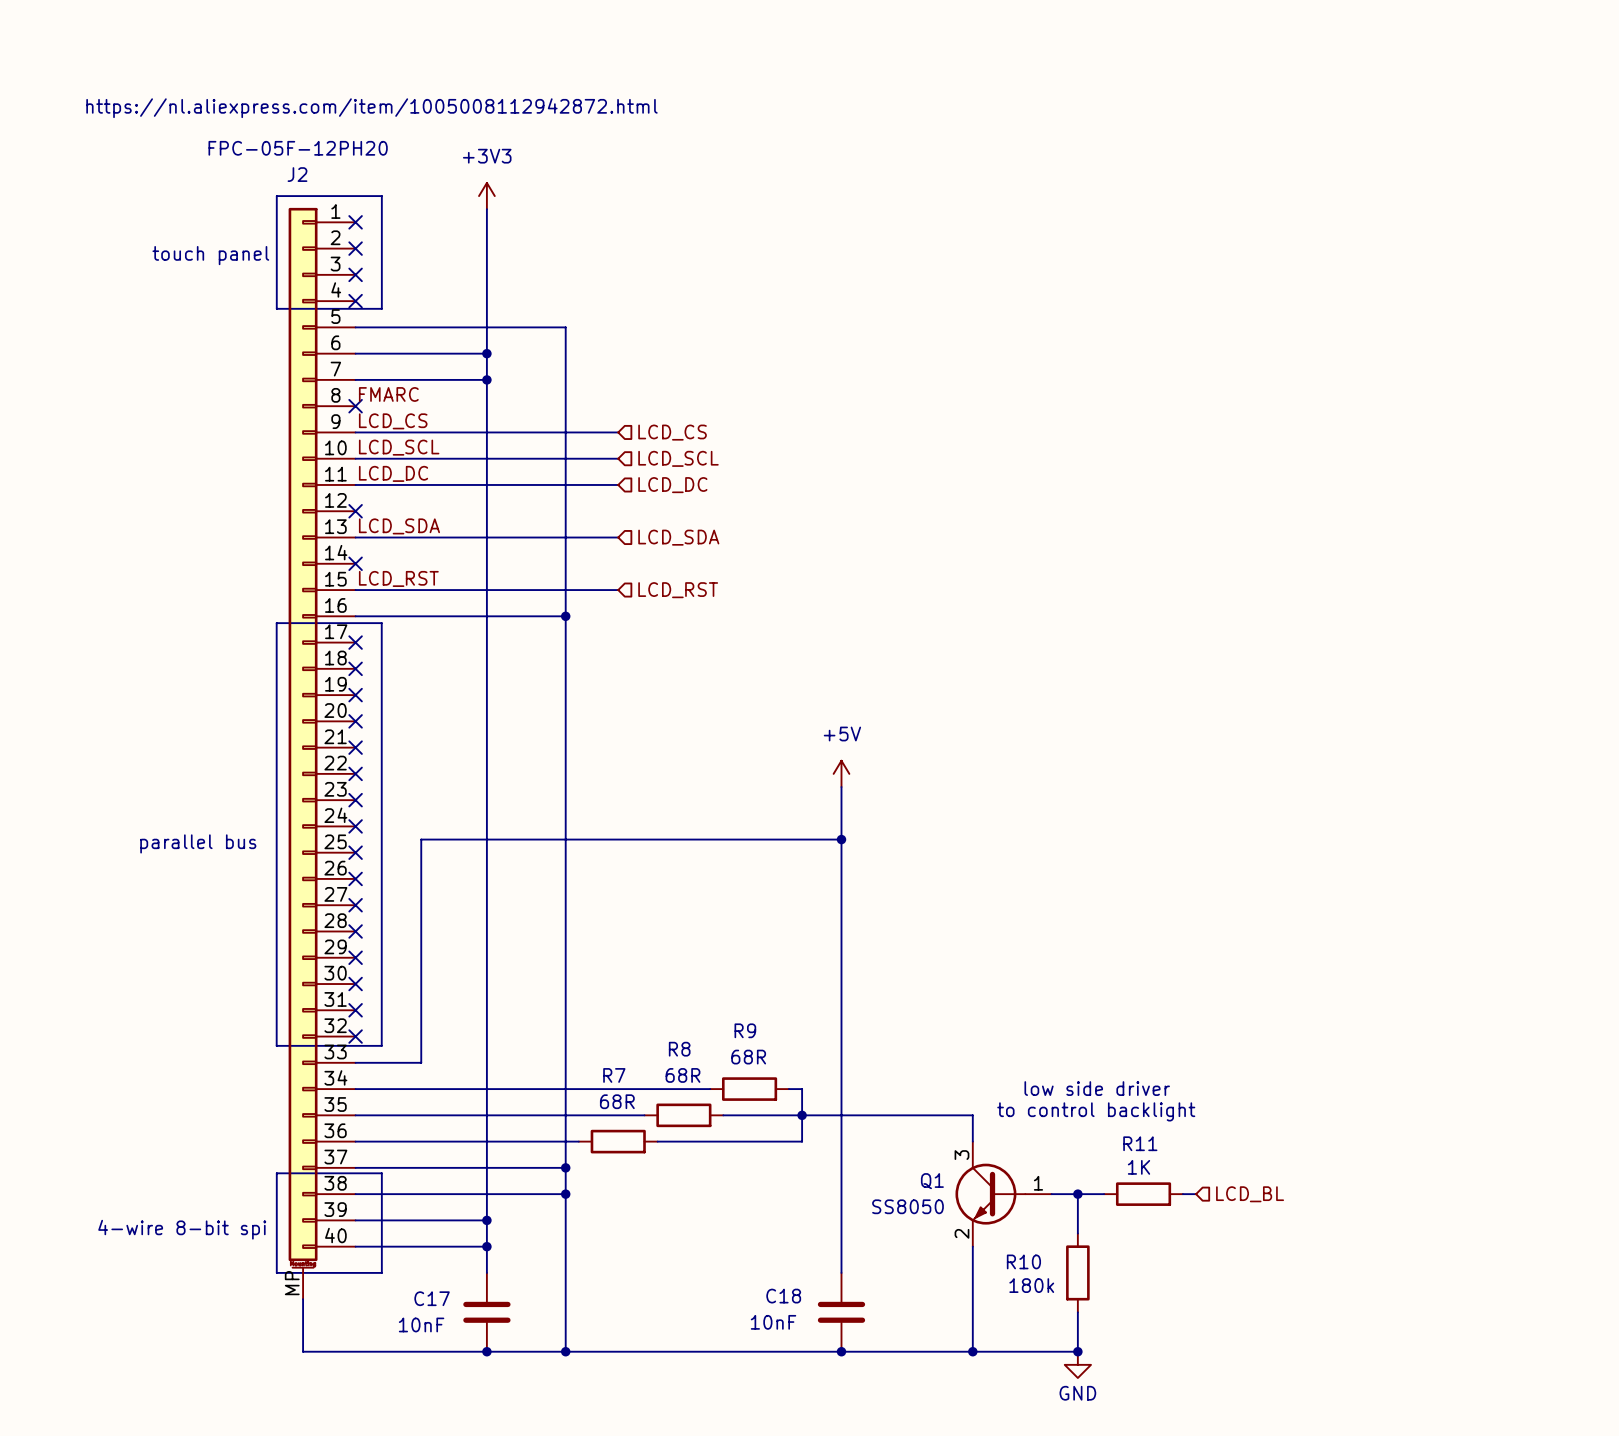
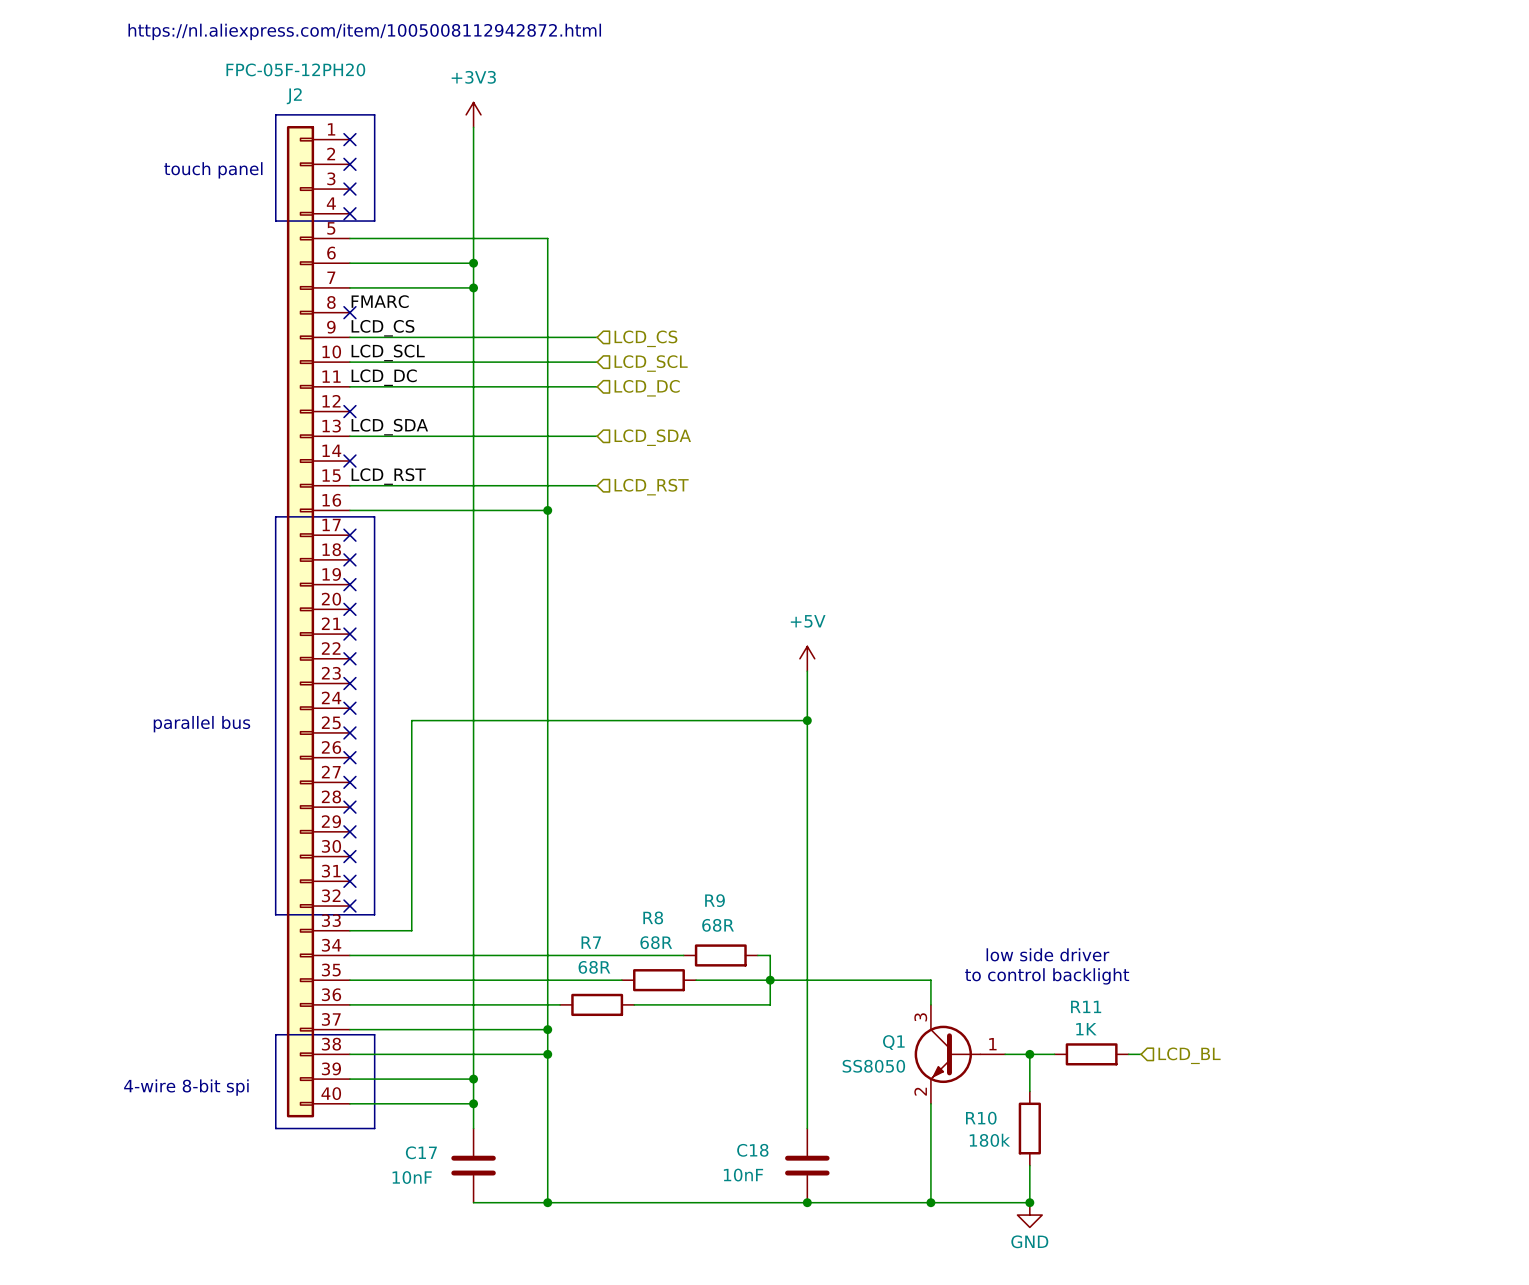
J2 symbol: [288, 207, 356, 1300] -> [286, 126, 350, 1118]
wire: (303, 1299) (303, 1351) (486, 1351) -> none
junction: (486, 1351) -> none

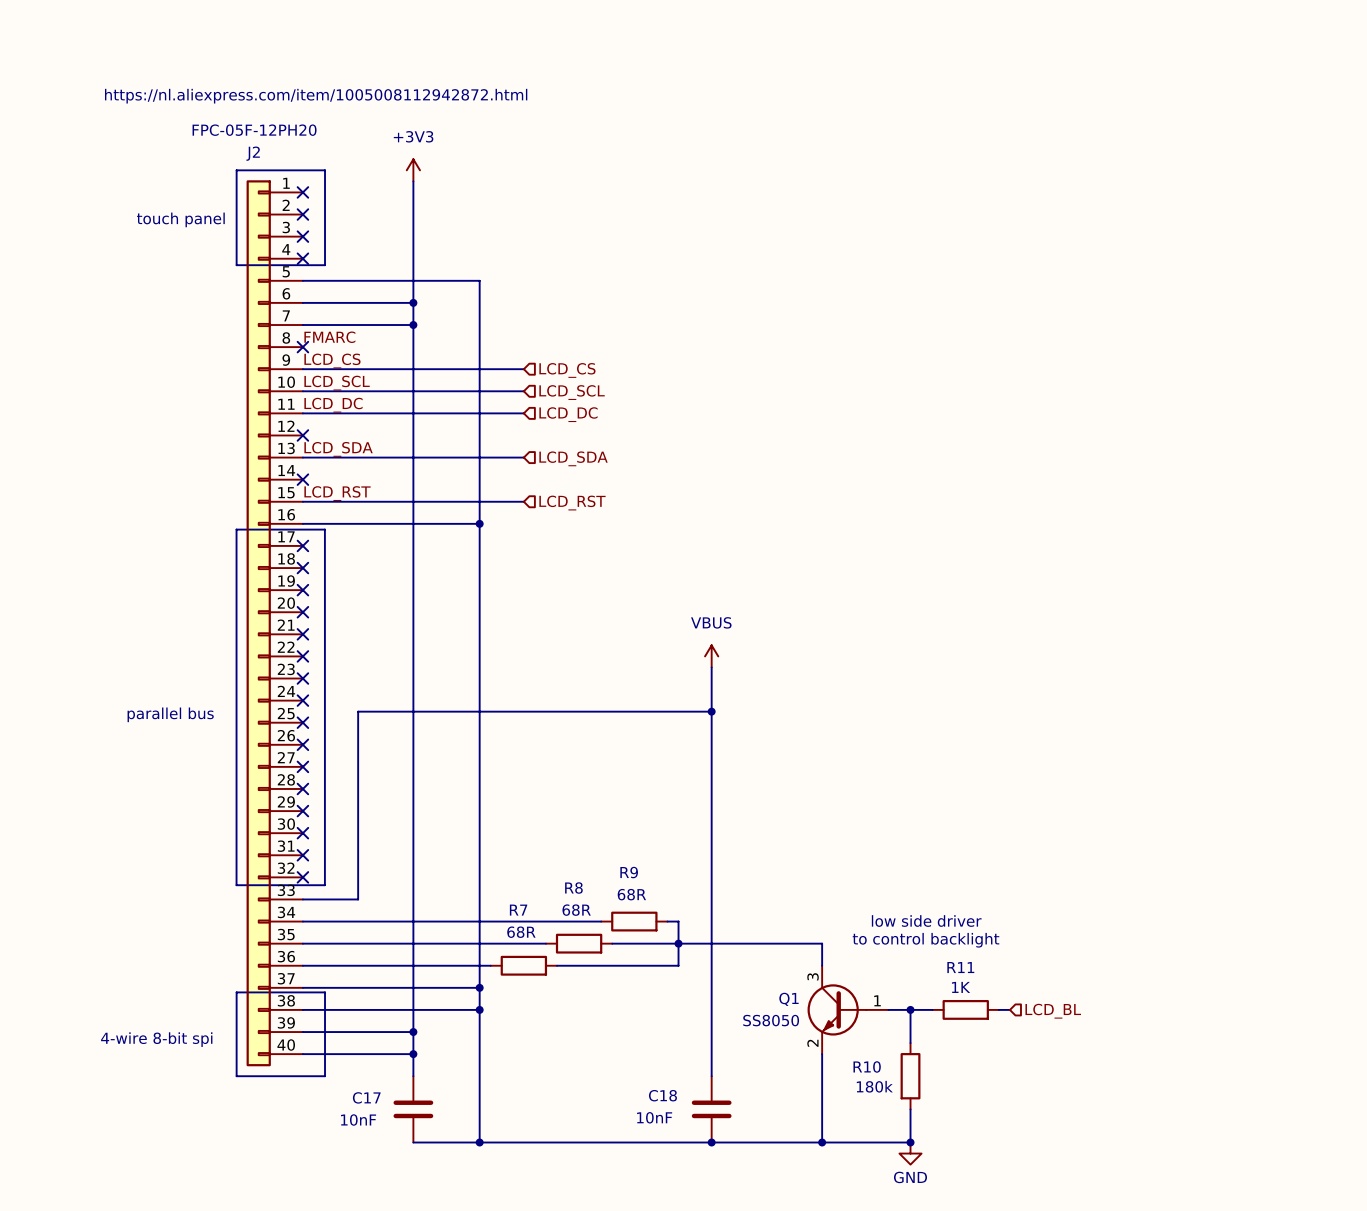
power symbol: +5V (807, 658) -> VBUS (711, 656)

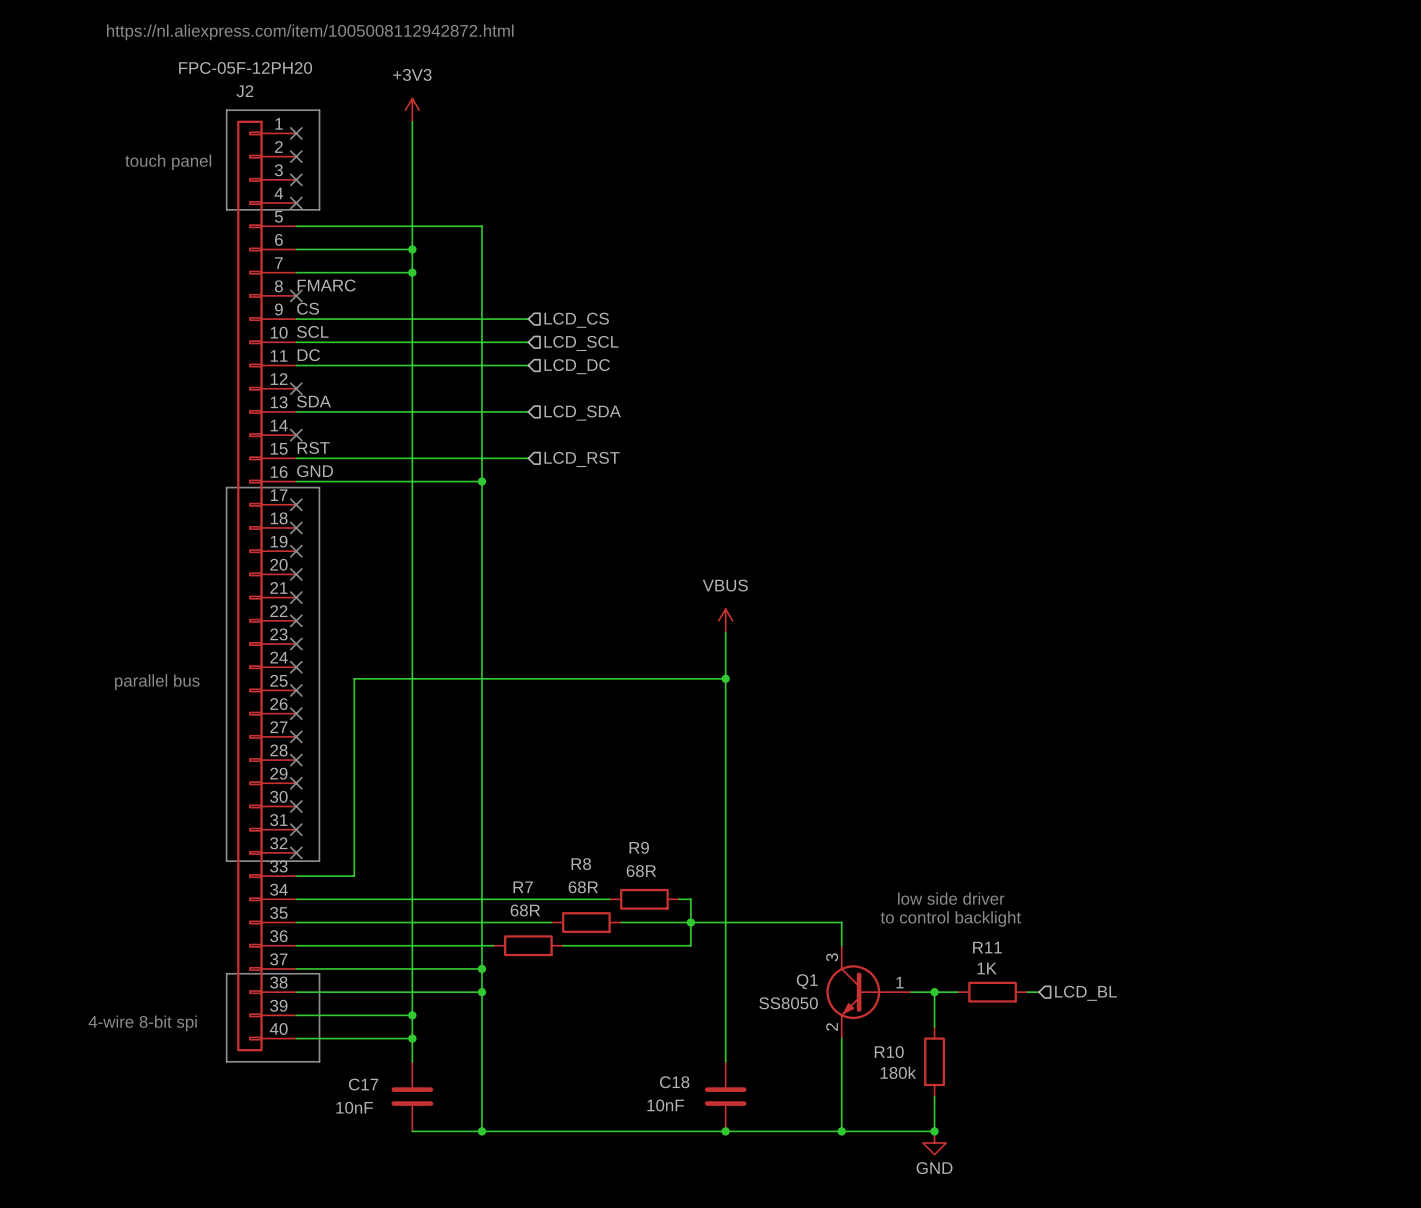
label: LCD_CS (332, 361) -> CS (308, 308)
label: LCD_SCL (337, 383) -> SCL (312, 331)
label: LCD_DC (333, 405) -> DC (308, 355)
label: LCD_SDA (338, 449) -> SDA (314, 401)
label: LCD_RST (337, 493) -> RST (313, 447)
label: none -> GND (315, 471)

